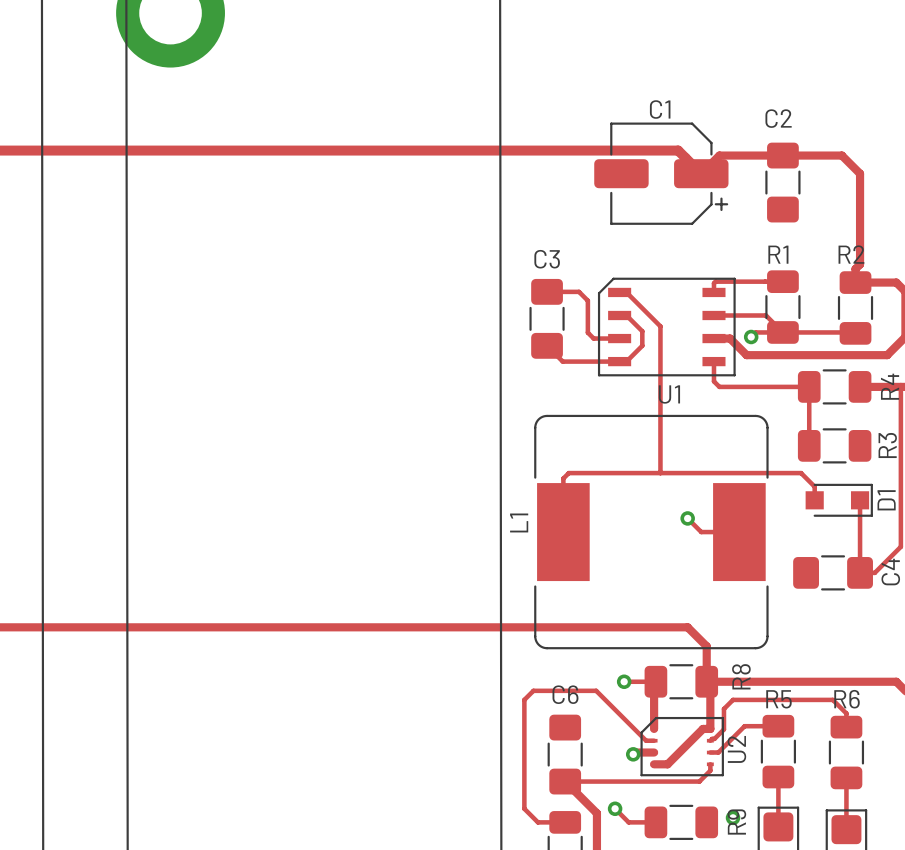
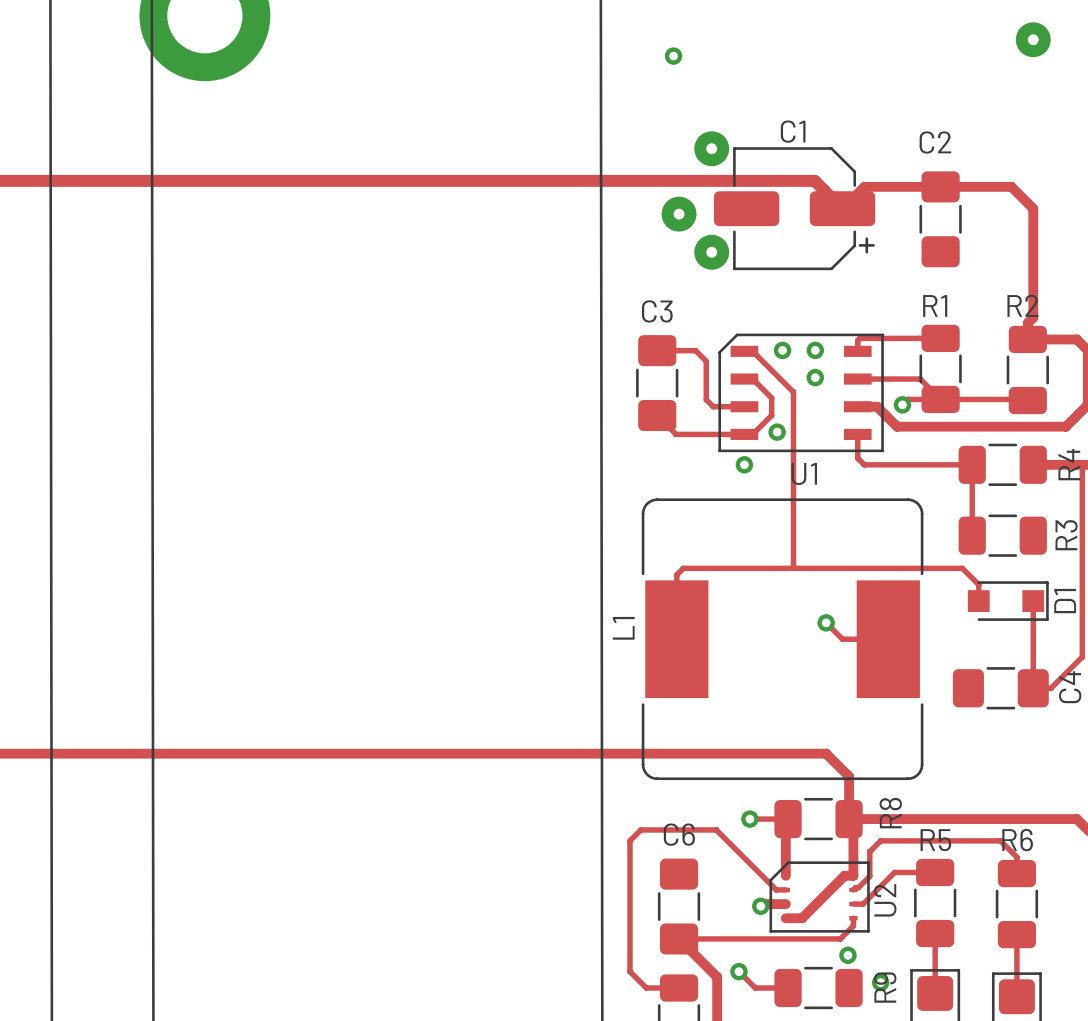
via: none -> (1033, 39)
via: none -> (673, 56)
via: none -> (711, 148)
via: none -> (679, 214)
via: none -> (711, 252)
via: none -> (782, 350)
via: none -> (815, 350)
via: none -> (815, 377)
via: none -> (777, 432)
via: none -> (744, 464)
via: none -> (847, 955)

